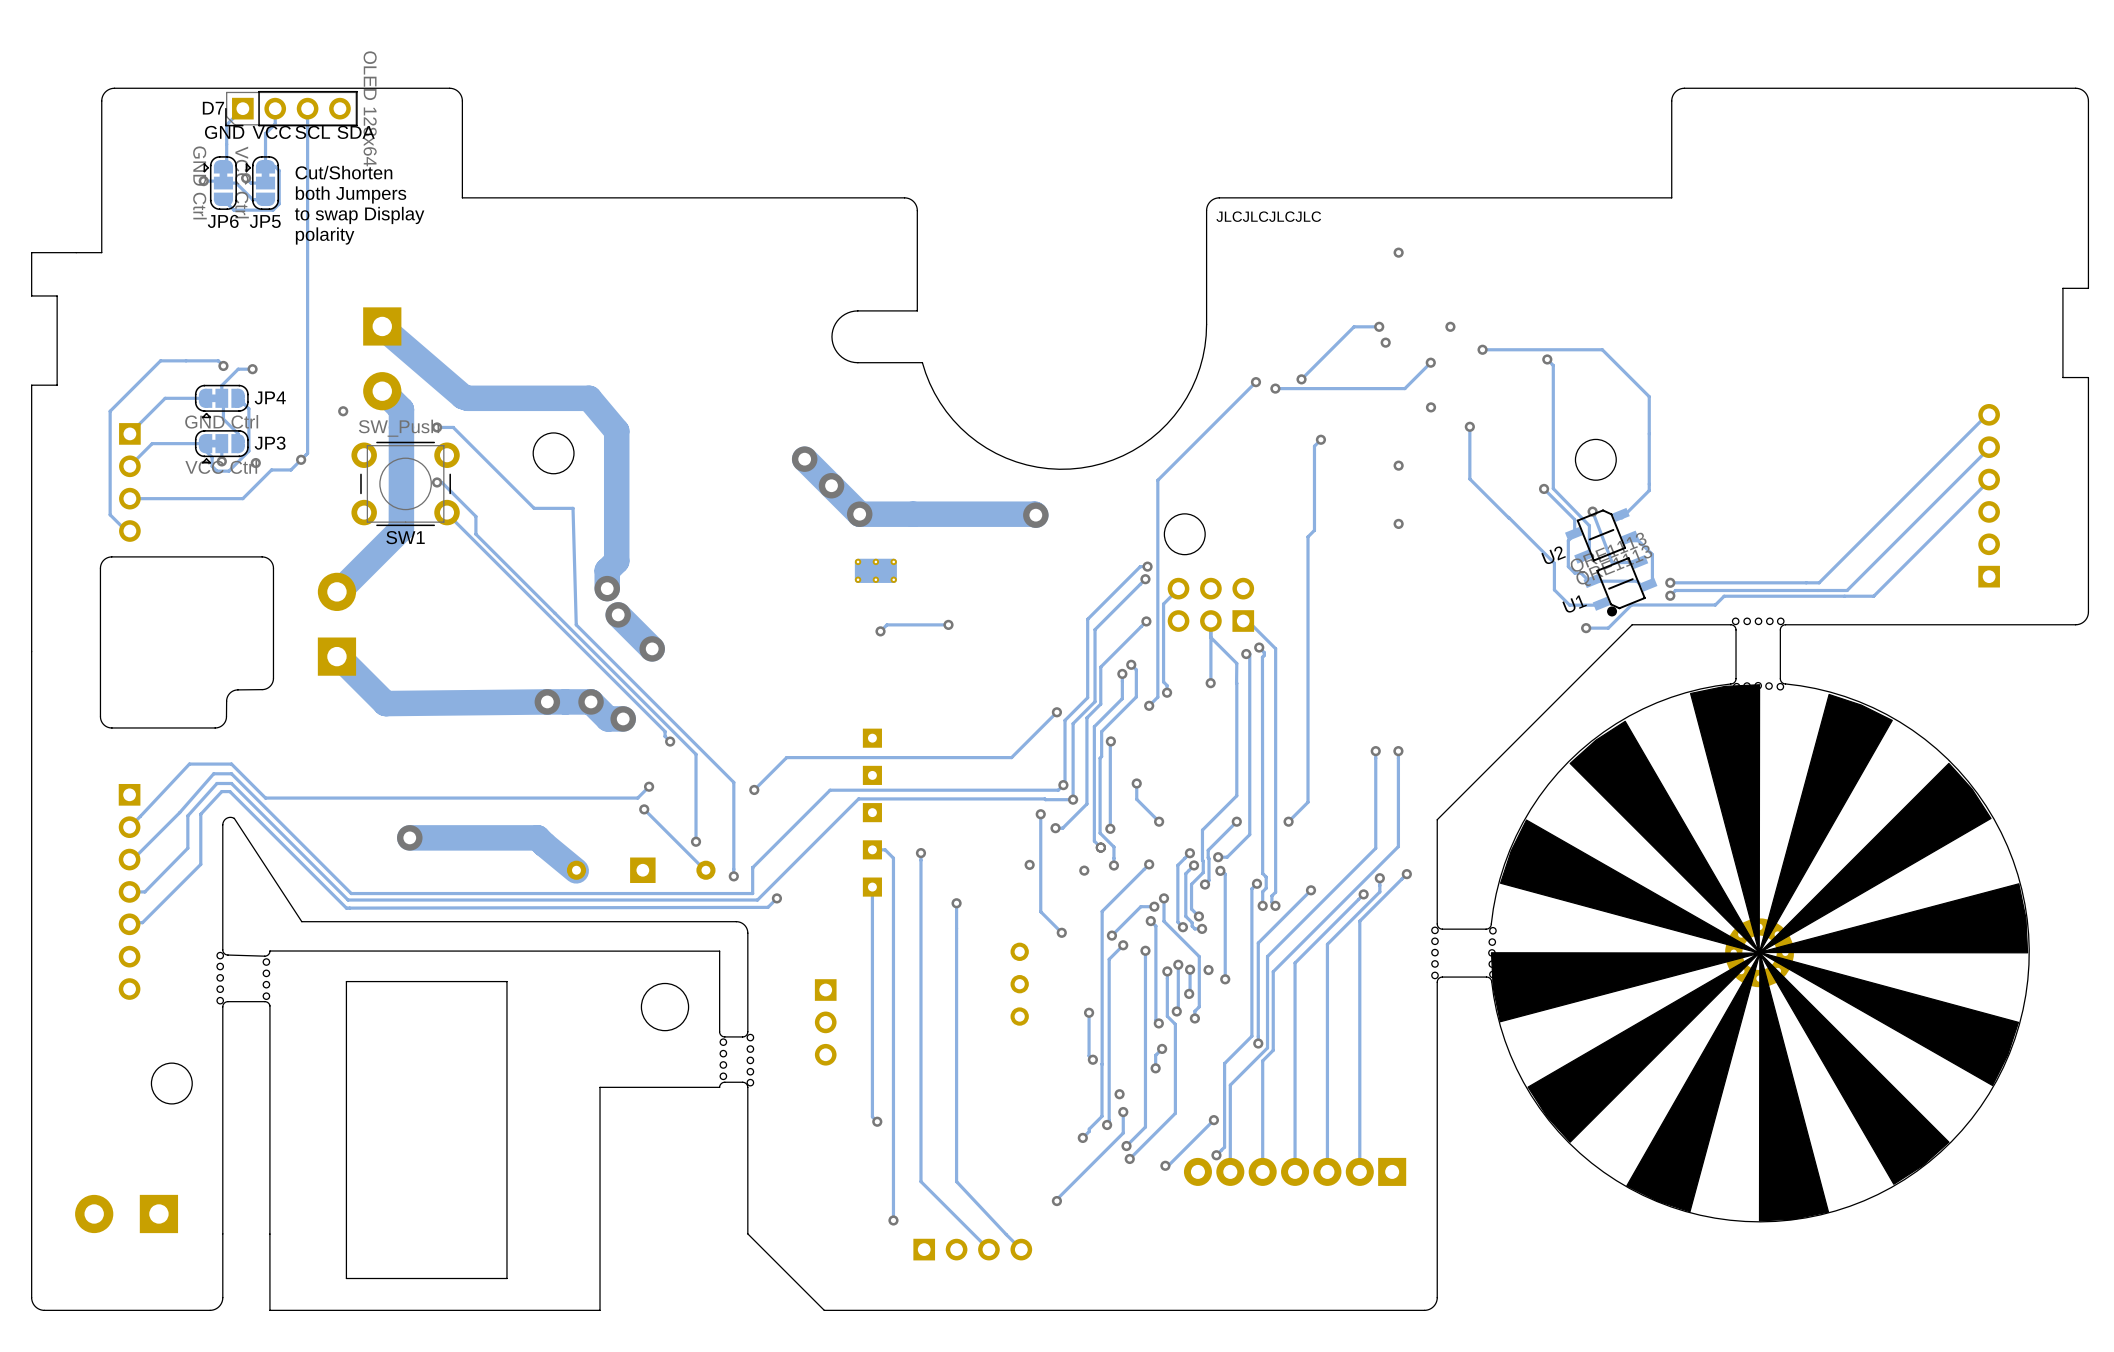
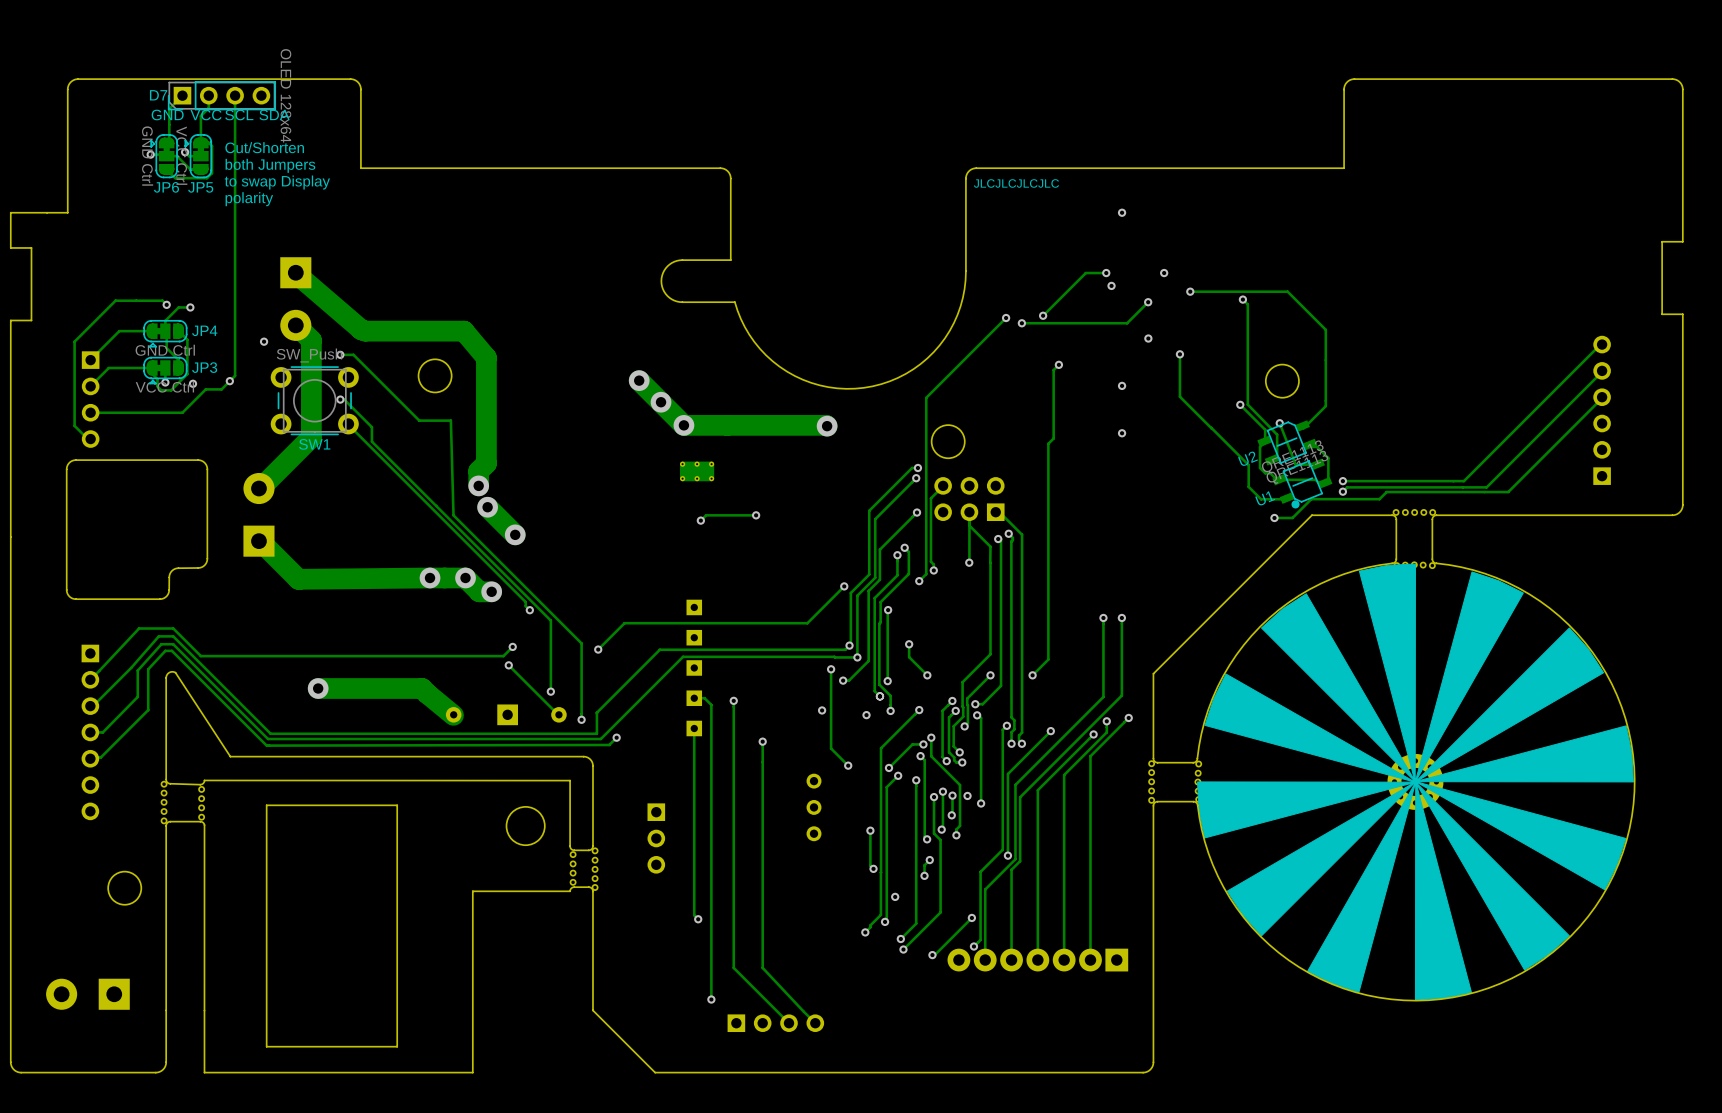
track: (1123, 1112) (1123, 1133) (1056, 1201) -> none
via: (1123, 1112) -> none
via: (1056, 1201) -> none

